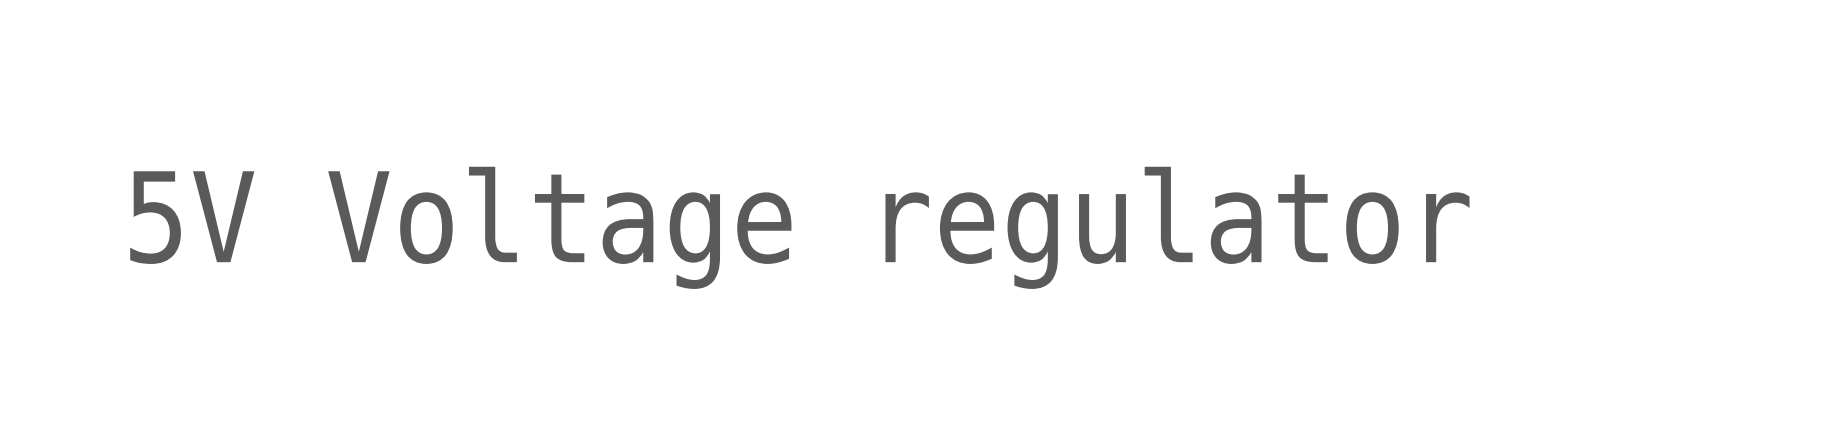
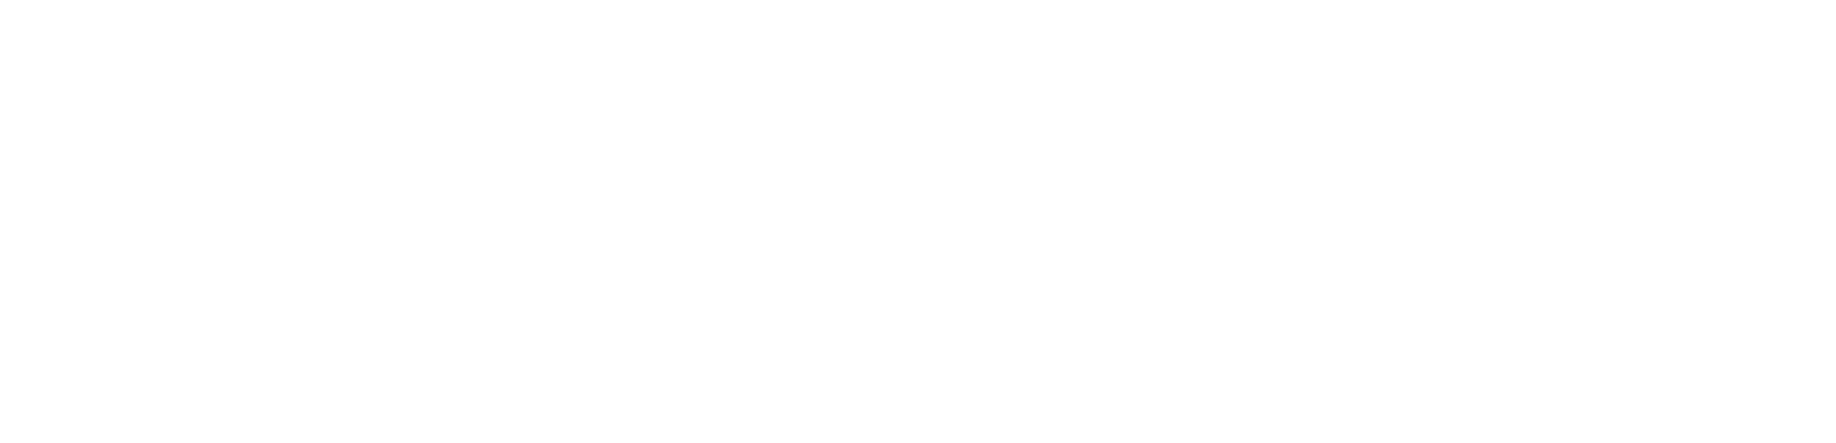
text: 5V Voltage regulator (799, 227) -> none

